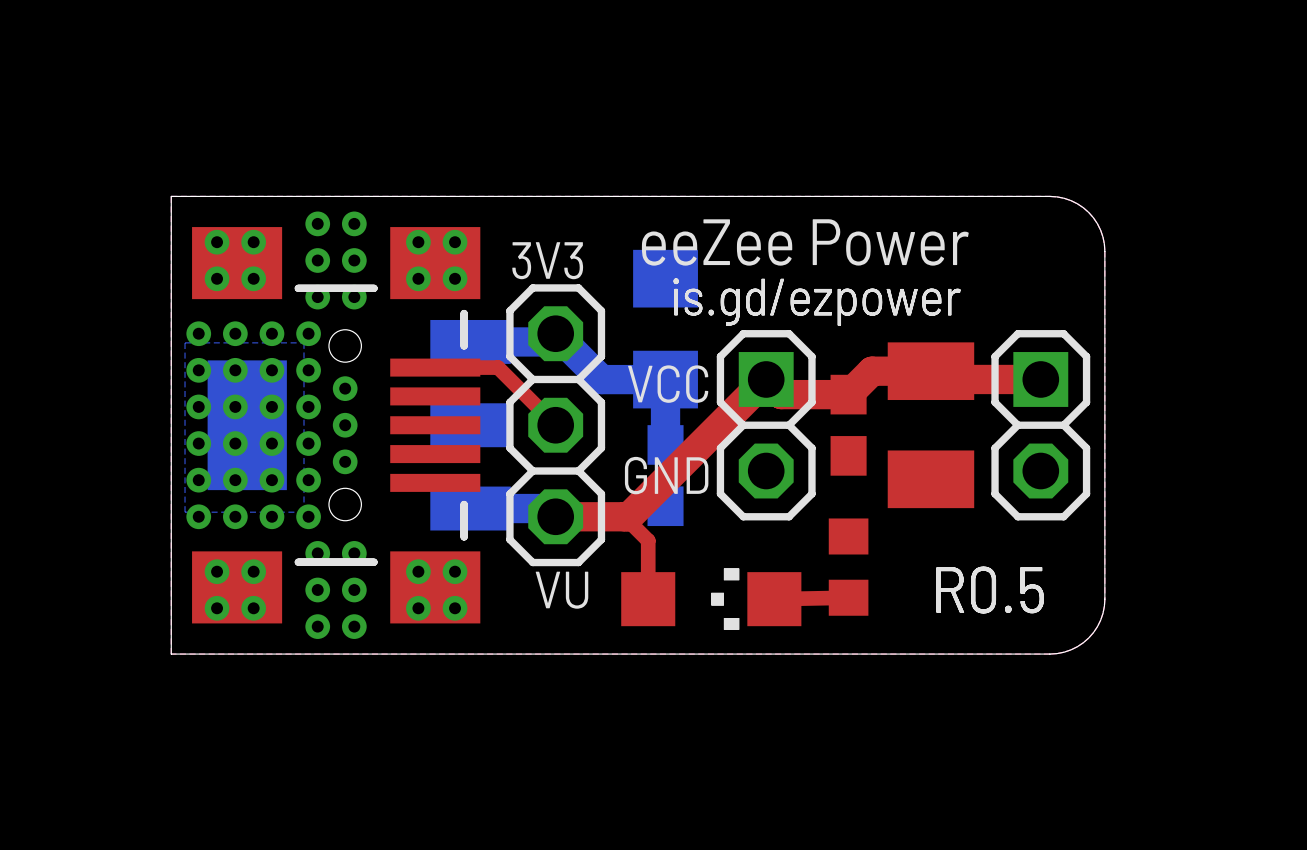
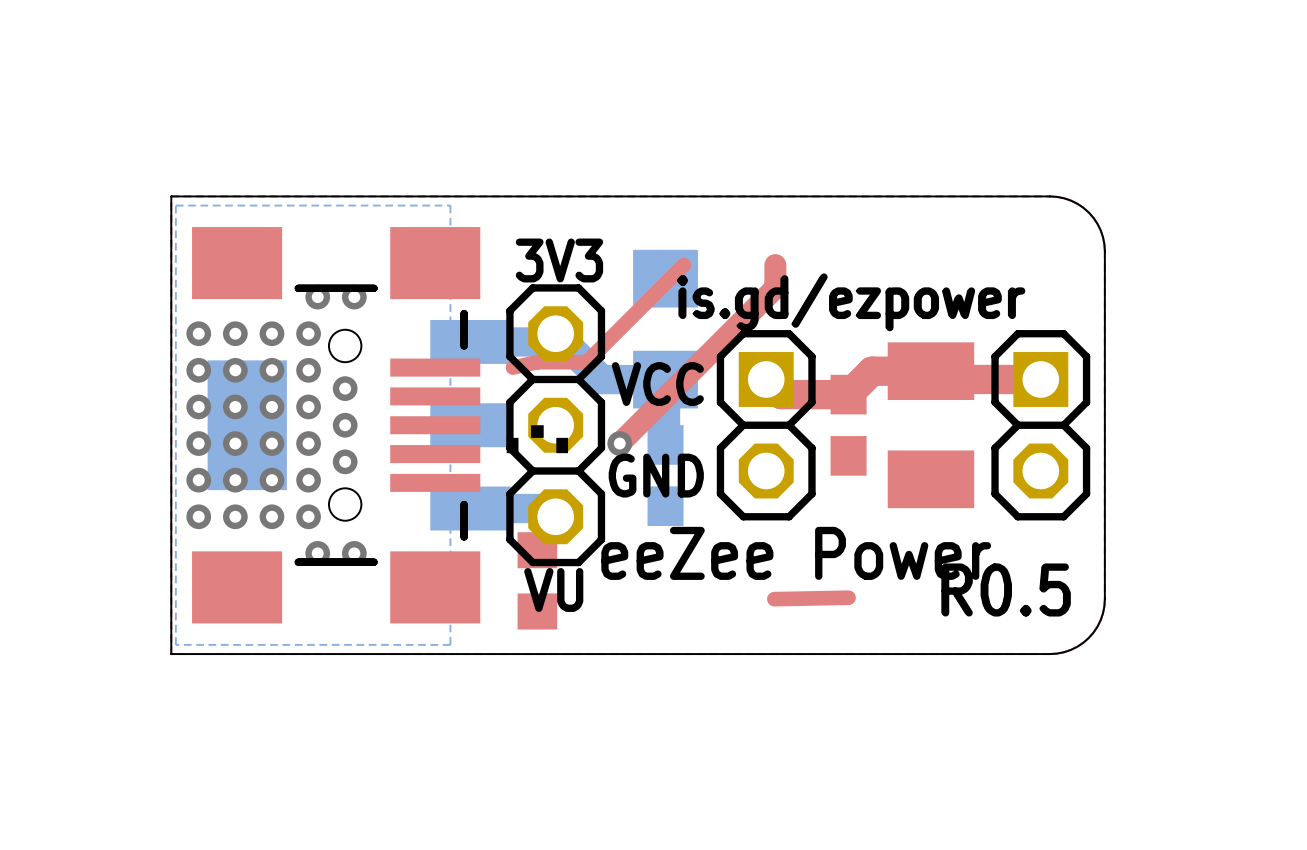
bottom zone outline: none -> (175, 205) (450, 205) (450, 644) (175, 644) (175, 205)
via: (317, 223) -> none
via: (354, 223) -> none
via: (217, 242) -> none
via: (253, 242) -> none
via: (418, 242) -> none
via: (455, 242) -> none
text position: eeZee Power (805, 242) -> eeZee Power (796, 553)
via: (317, 260) -> none
via: (354, 260) -> none
top track: none -> (683, 265) (586, 362) (537, 362) (513, 367)
top track: none -> (775, 265) (775, 287) (619, 443)
via: (217, 278) -> none
via: (253, 278) -> none
via: (418, 278) -> none
via: (455, 278) -> none
bottom zone outline: (185, 342) (304, 342) (304, 512) (185, 512) (185, 342) -> none
top track: (435, 367) (498, 367) (555, 425) -> none
top track: (766, 379) (628, 516) (555, 516) -> none
drawing: none -> [506, 437, 569, 454]
via: none -> (619, 443)
top track: (624, 516) (648, 540) (648, 599) -> none
part position: (848, 567) -> (537, 580)
drawing: [723, 568, 740, 630] -> none
via: (217, 571) -> none
via: (253, 571) -> none
via: (418, 571) -> none
via: (455, 571) -> none
via: (317, 589) -> none
via: (354, 589) -> none
part: (711, 599) -> none
drawing position: (717, 599) -> (537, 431)
via: (217, 608) -> none
via: (253, 608) -> none
via: (418, 608) -> none
via: (455, 608) -> none
via: (317, 626) -> none
via: (354, 626) -> none

